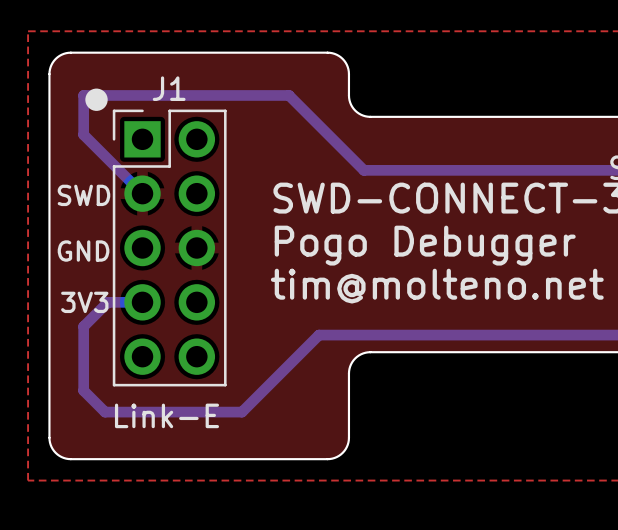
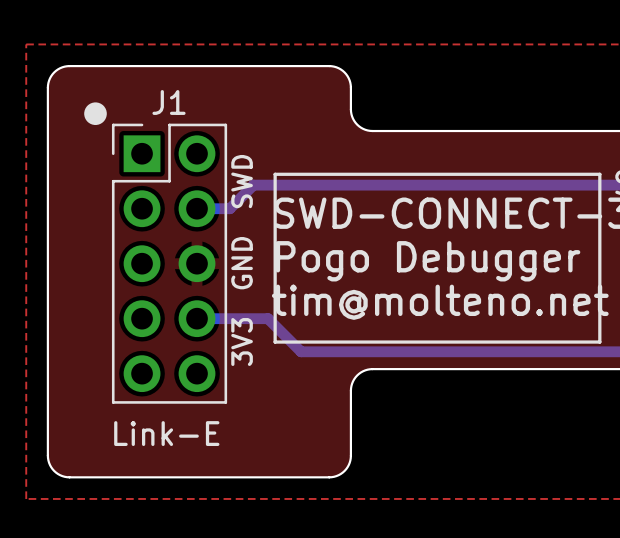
line: none -> (275, 174) (599, 174) (599, 342) (275, 342) (275, 174)
bottom track: (363, 170) (289, 95) (83, 95) (83, 134) (142, 193) -> (366, 185) (253, 185) (229, 208) (197, 208)
text rotation: 0° (83, 195) -> 90° counterclockwise (242, 181)
text position: SWD (83, 195) -> SWD (242, 181)
text rotation: 0° (83, 251) -> 90° counterclockwise (242, 263)
text position: GND (83, 251) -> GND (242, 263)
text rotation: 0° (84, 302) -> 90° counterclockwise (242, 342)
text position: 3V3 (84, 302) -> 3V3 (242, 342)
bottom track: (142, 302) (107, 302) (83, 326) (83, 390) (105, 412) (241, 412) (319, 335) -> (197, 318) (268, 318) (301, 351) (320, 351)

